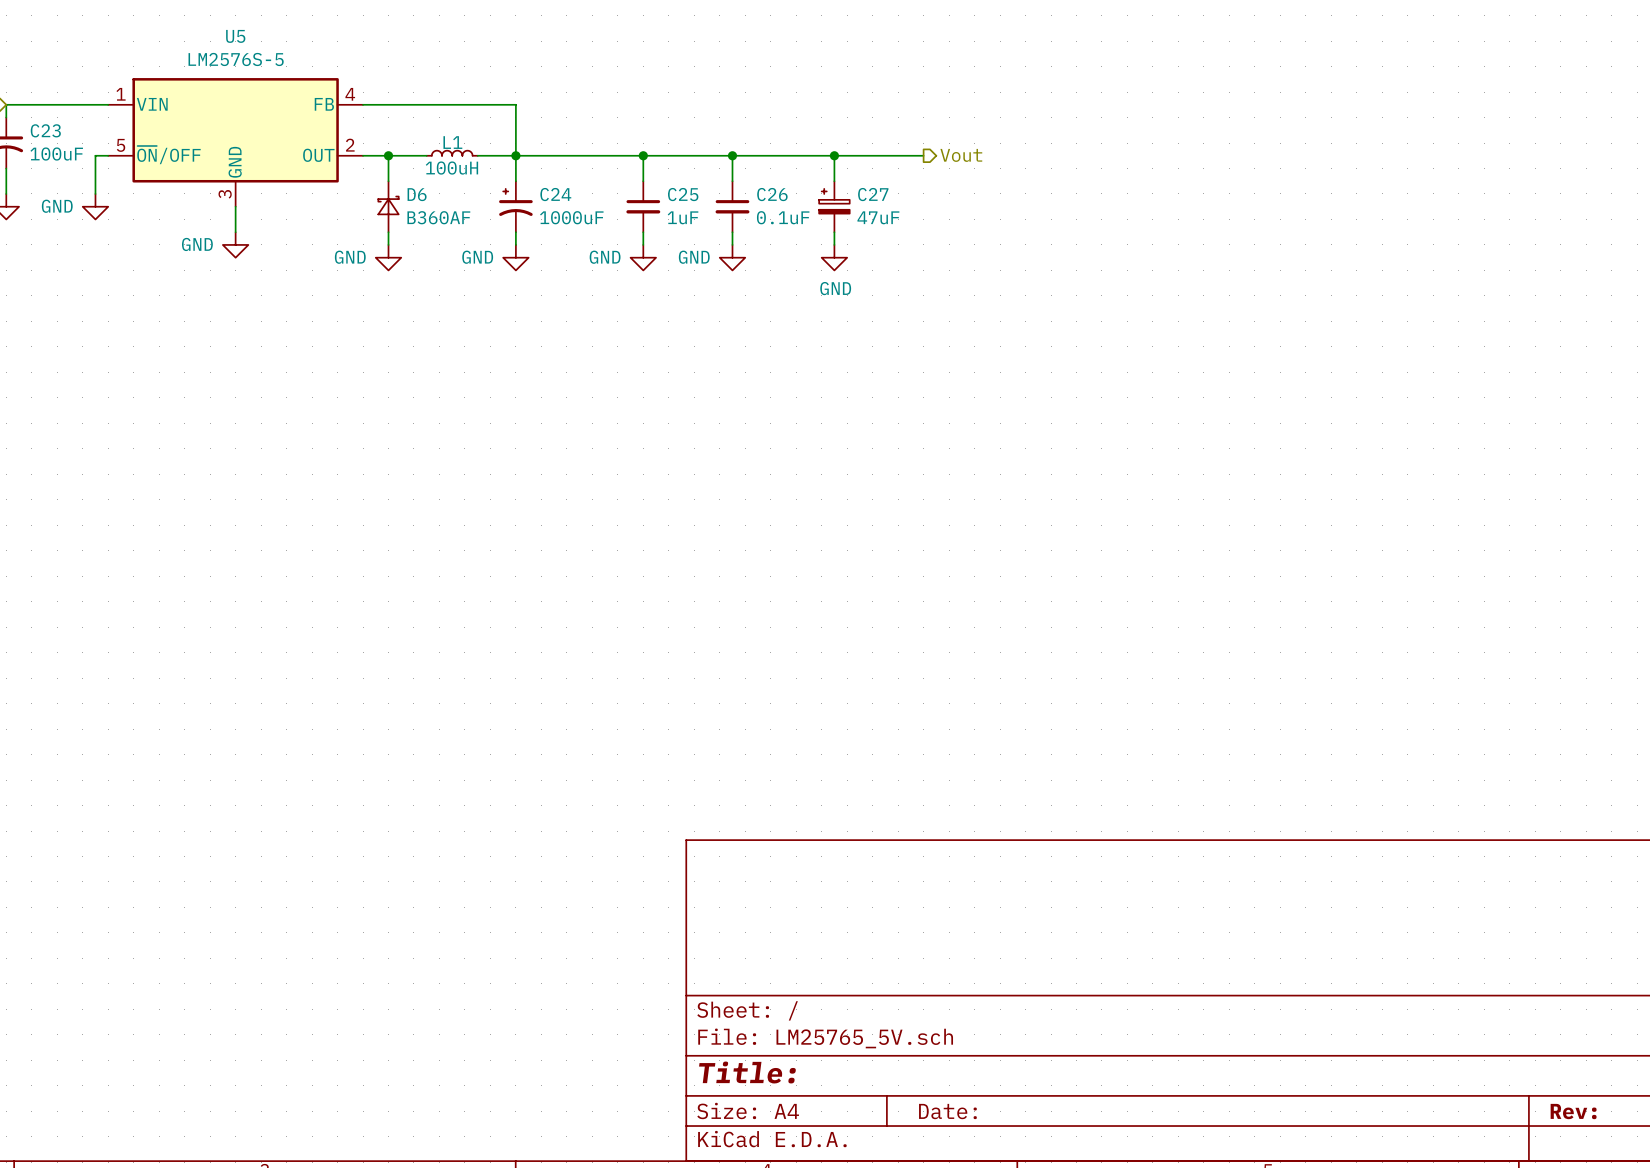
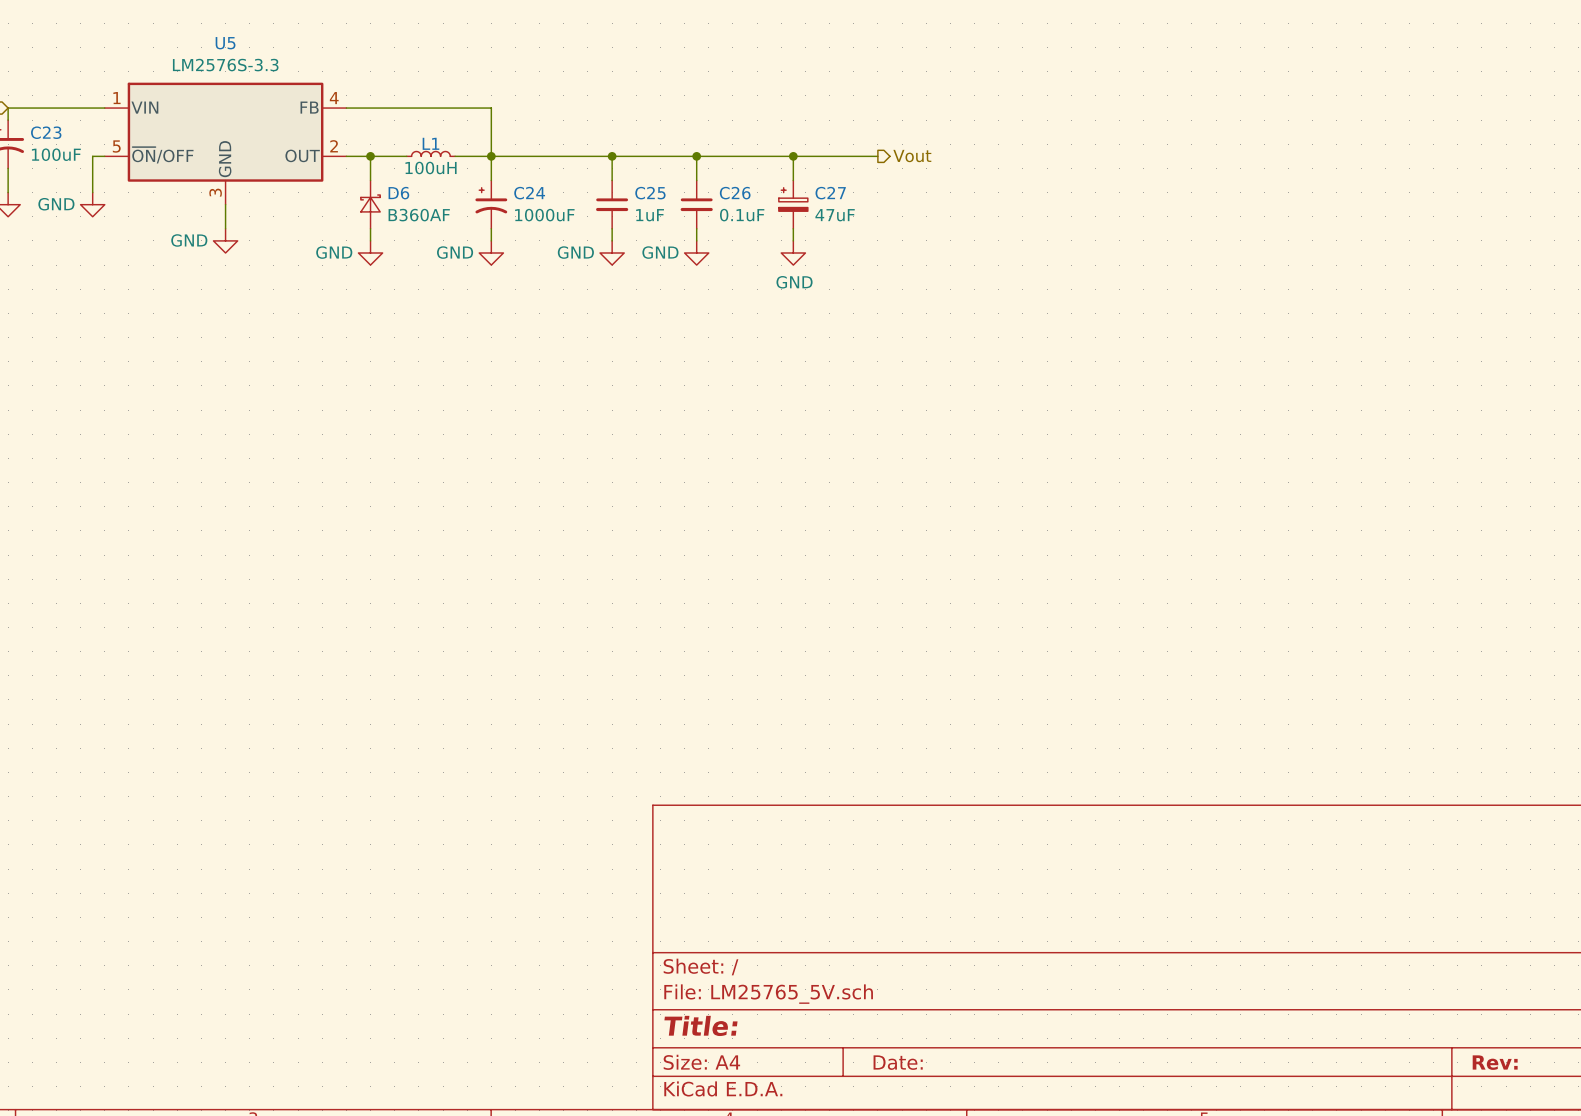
U5 value: LM2576S-5 (236, 59) -> LM2576S-3.3 (225, 65)

